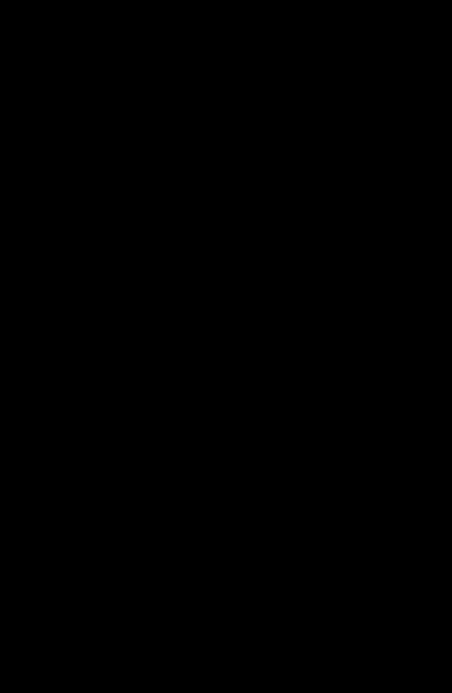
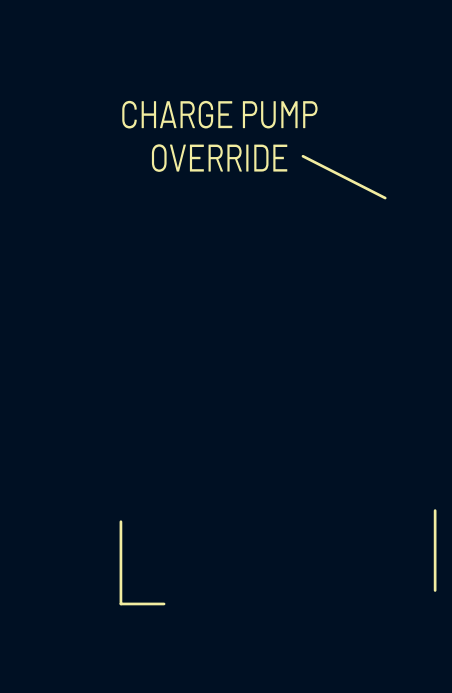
text: none -> CHARGE PUMP (219, 114)
line: none -> (302, 156) (385, 198)
text: none -> OVERRIDE (219, 158)
line: none -> (435, 510) (435, 590)
line: none -> (120, 521) (120, 603) (164, 603)

